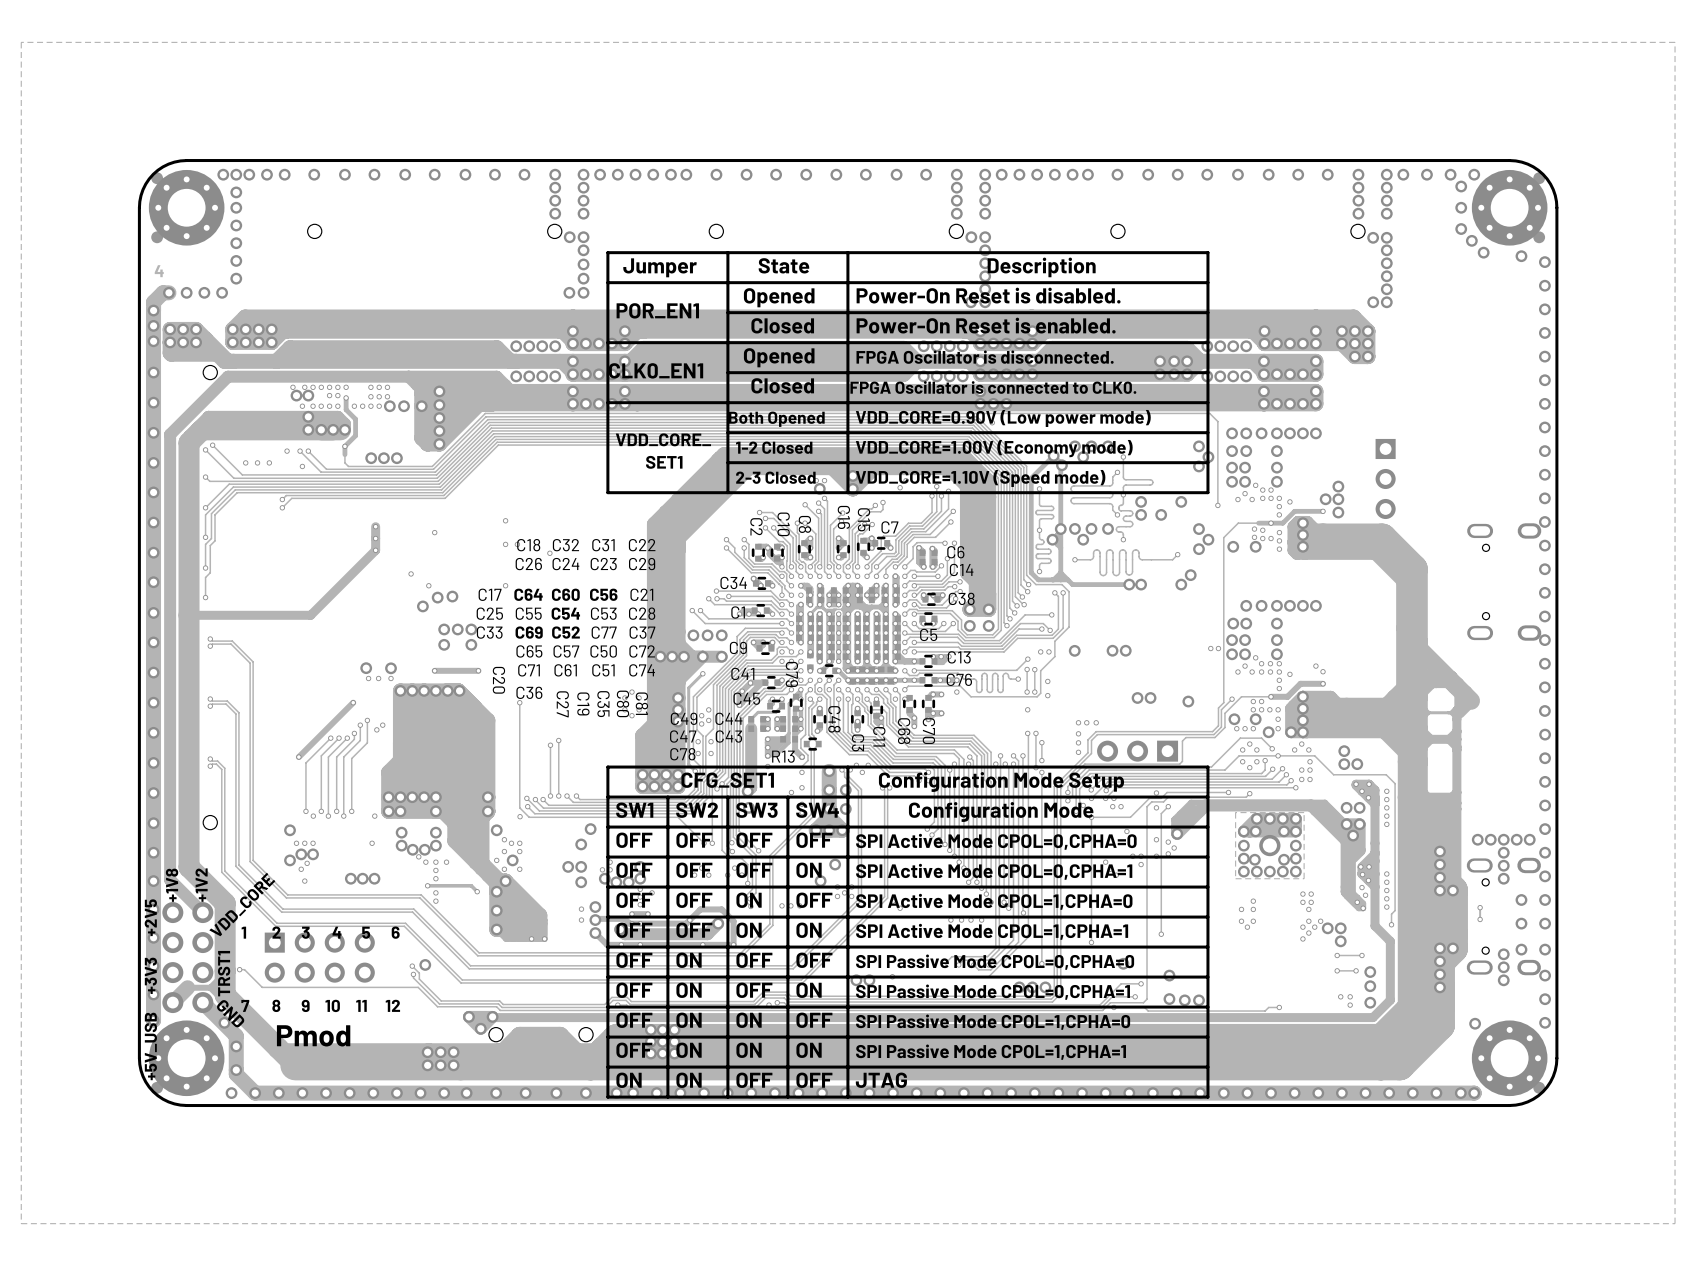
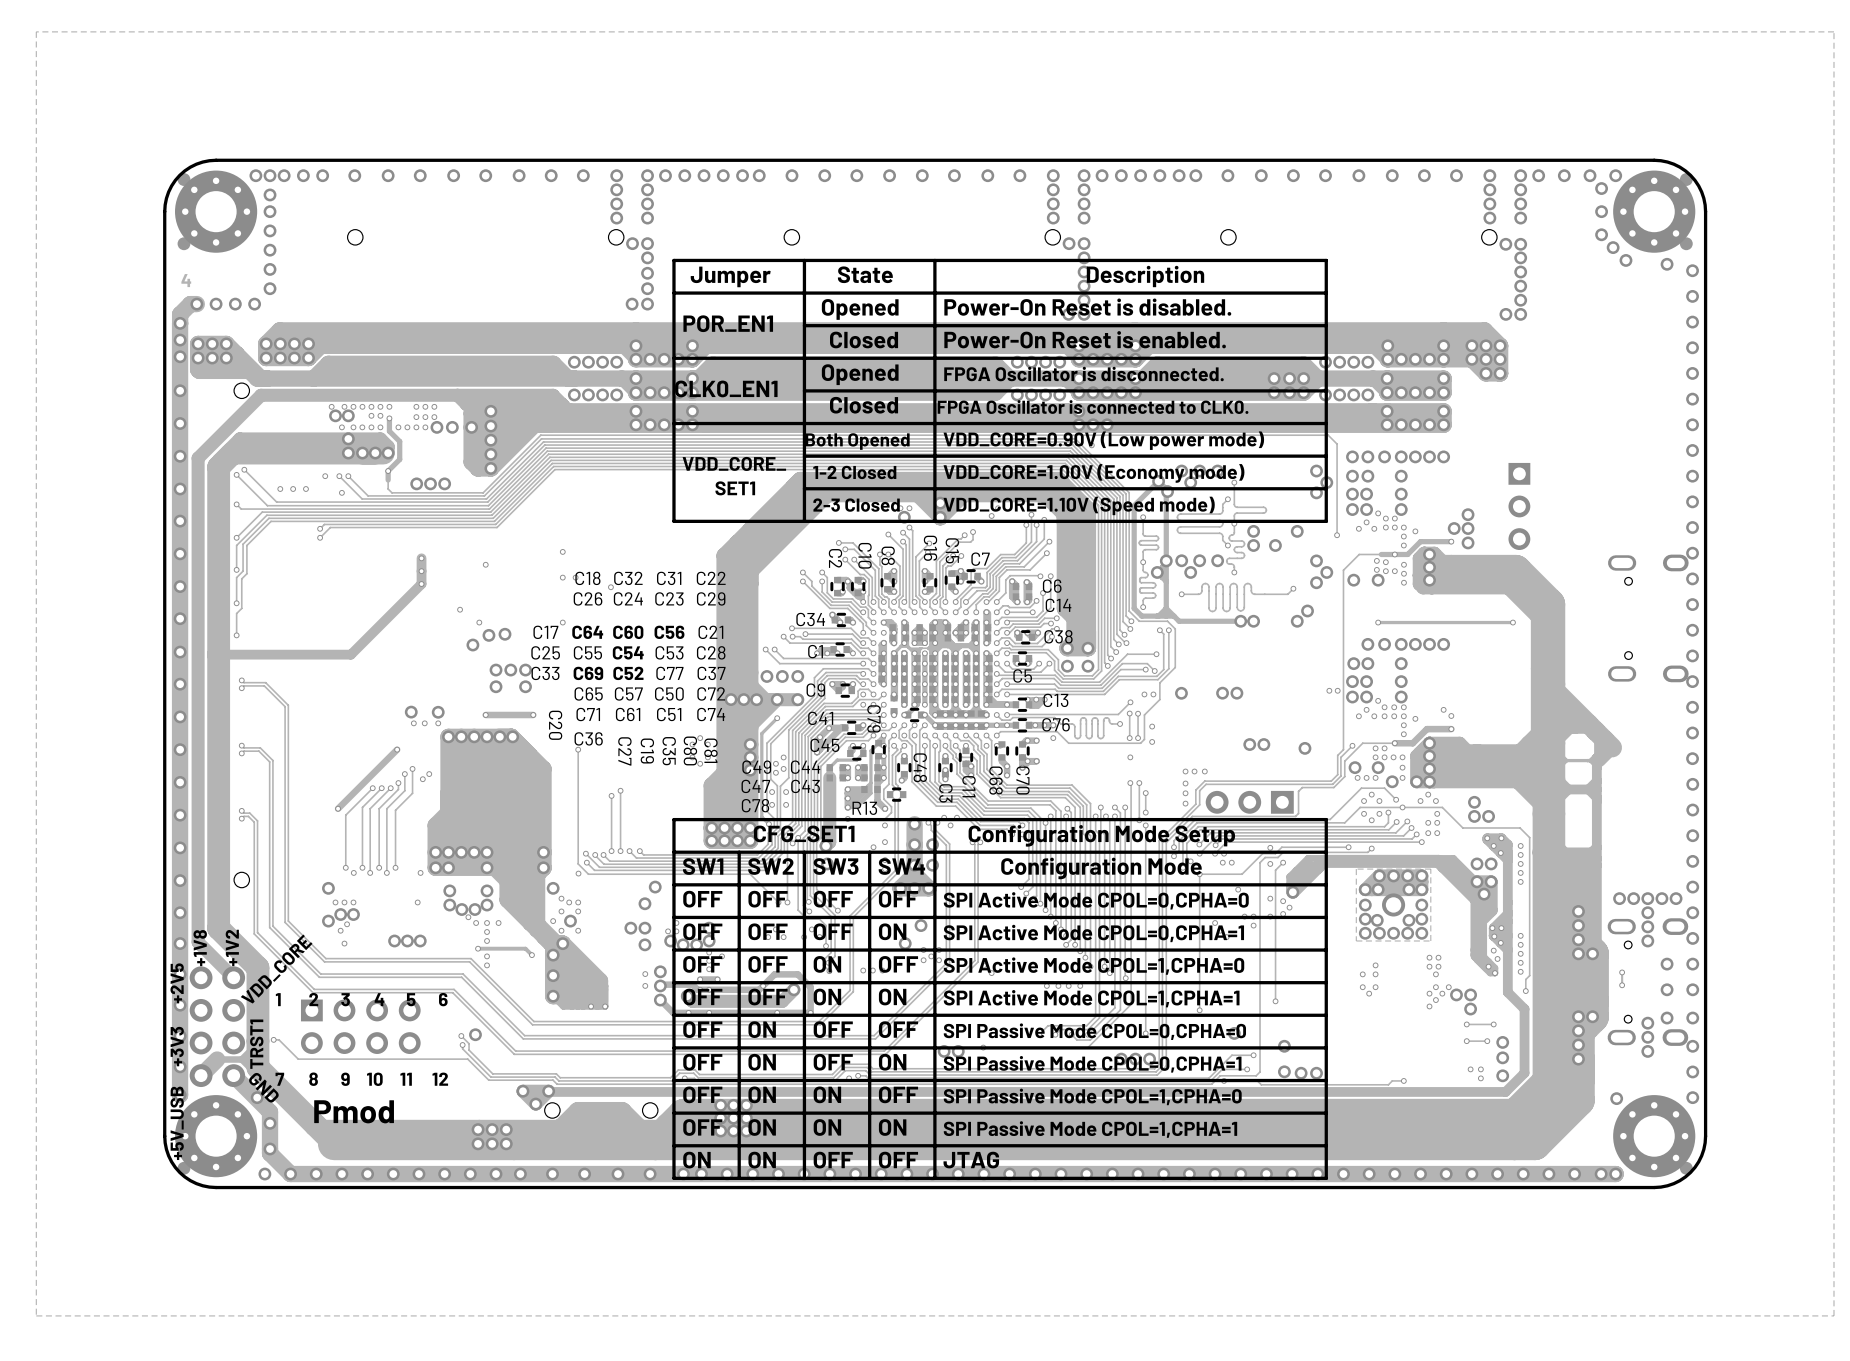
via: none -> (1378, 622)
track: none -> (1512, 622) (1378, 622)
via: none -> (1512, 622)

